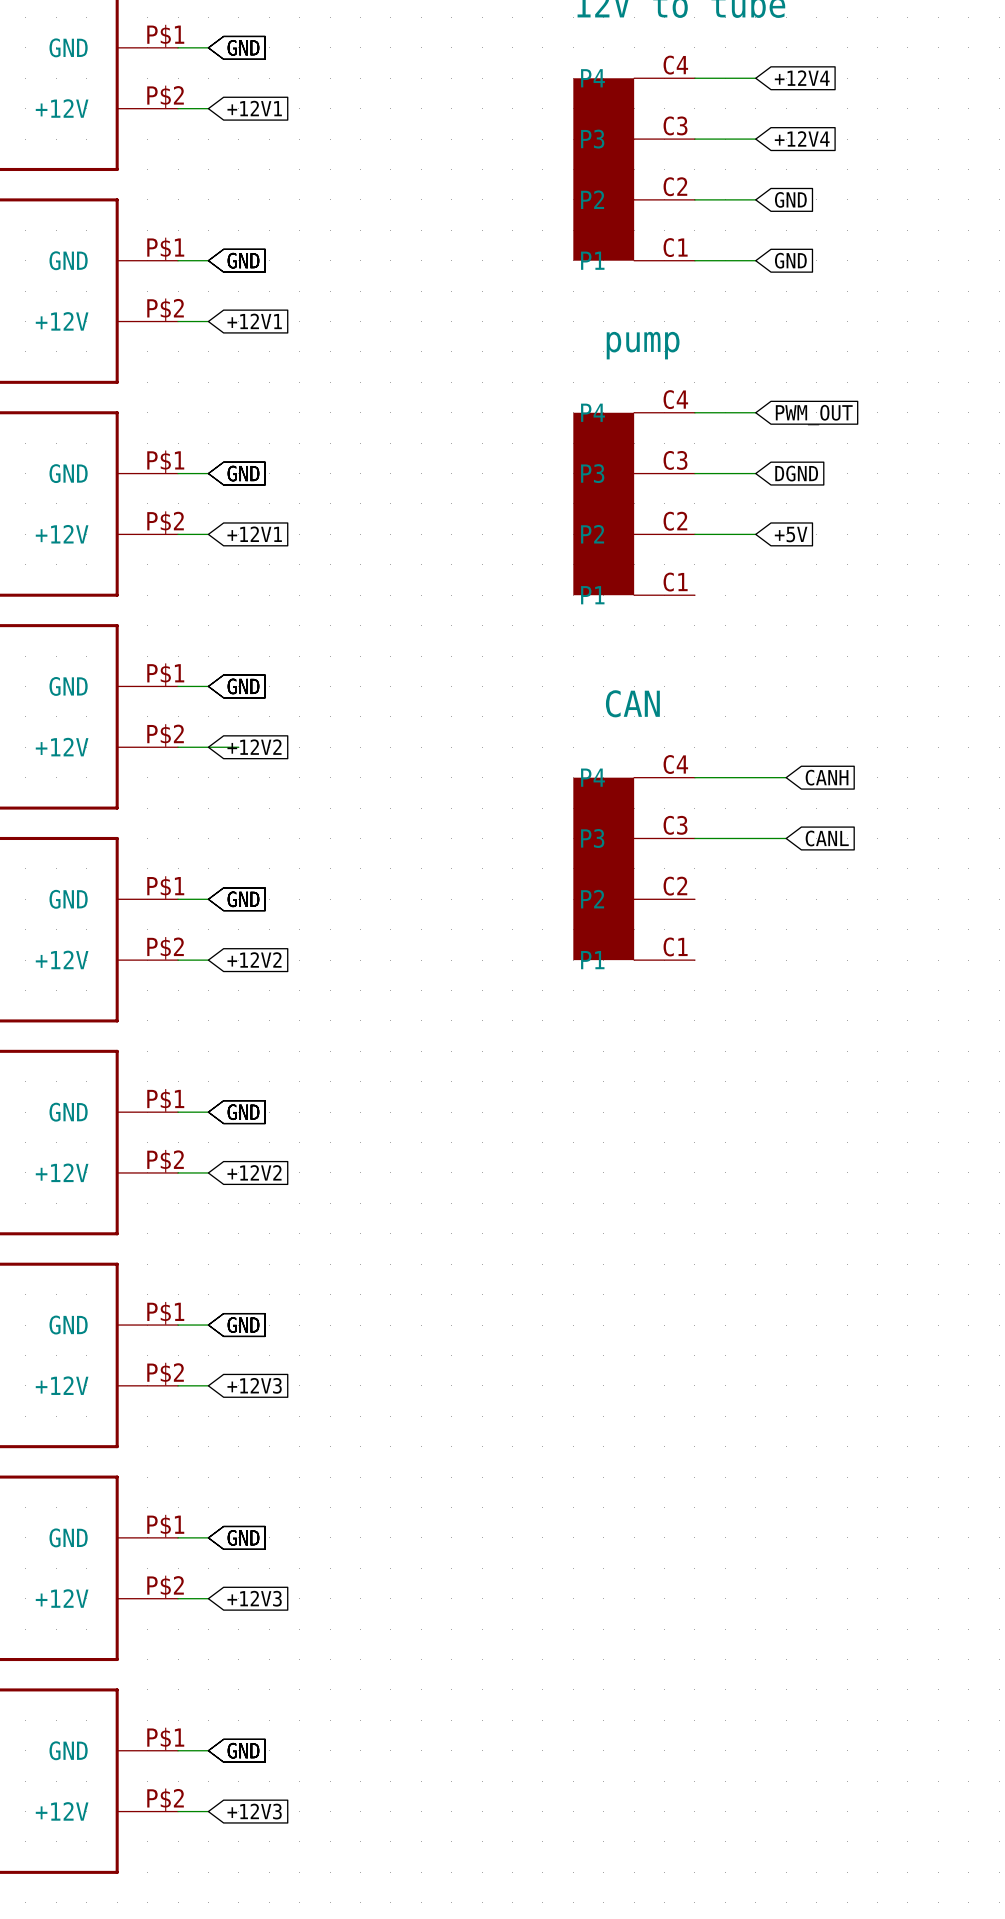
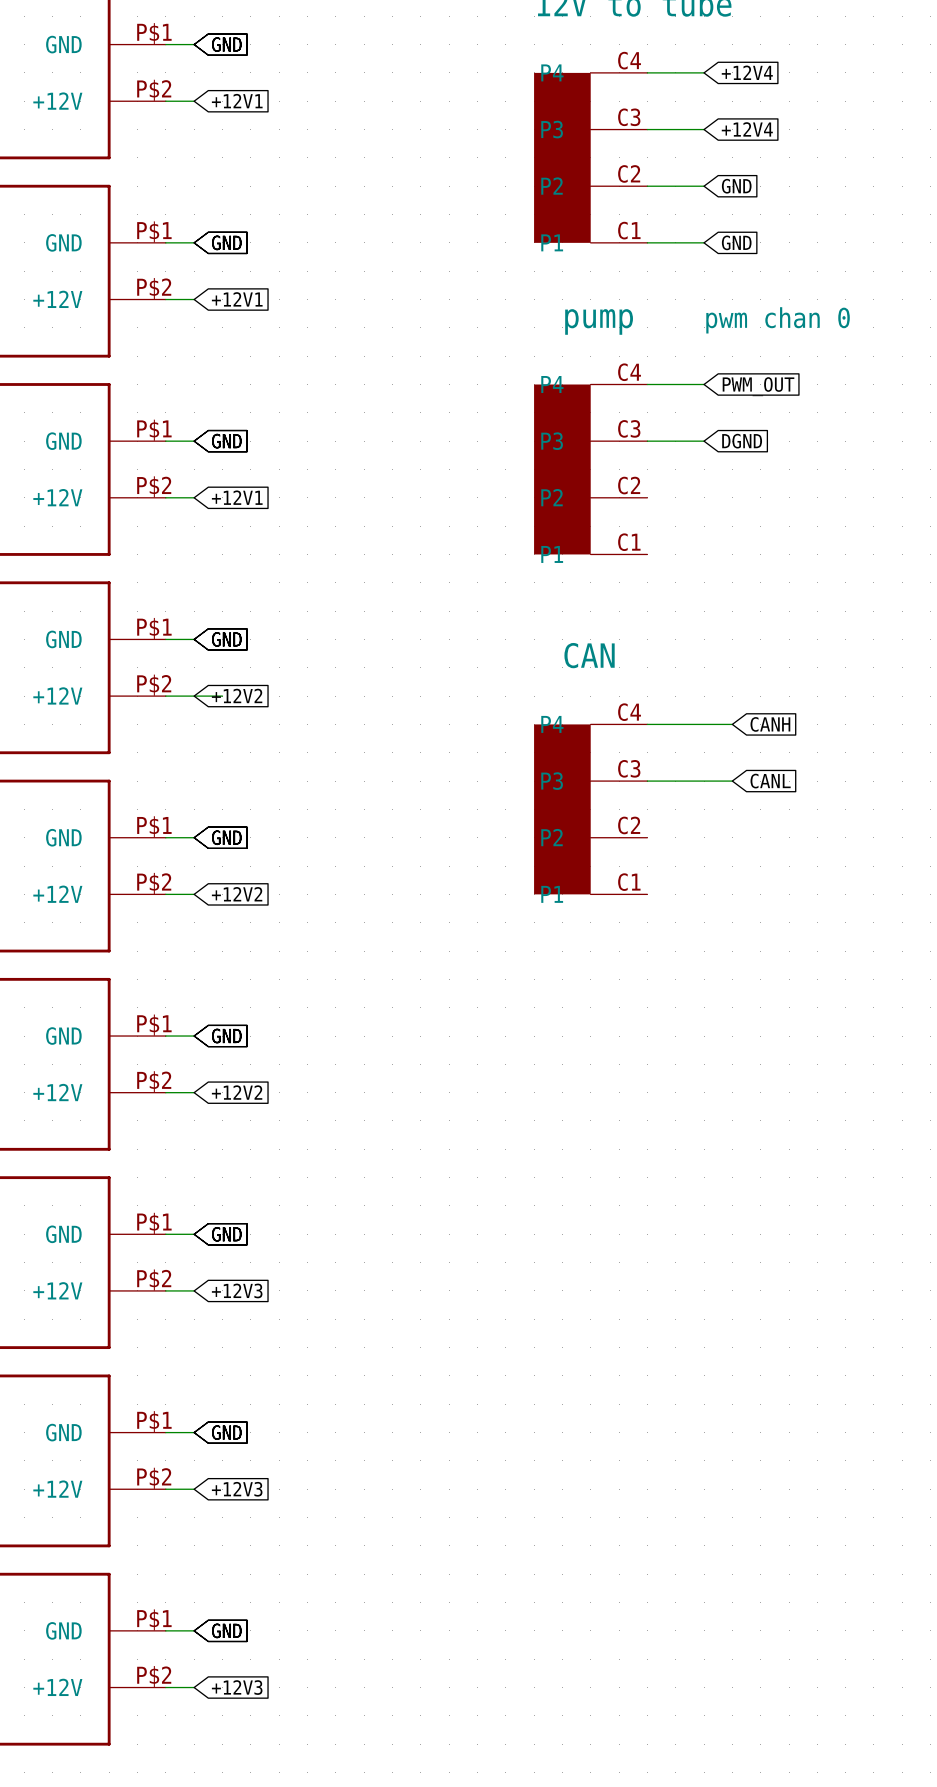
text: none -> pwm chan 0 (778, 320)
wire: (694, 534) (755, 534) -> none
global label: +5V (791, 534) -> none

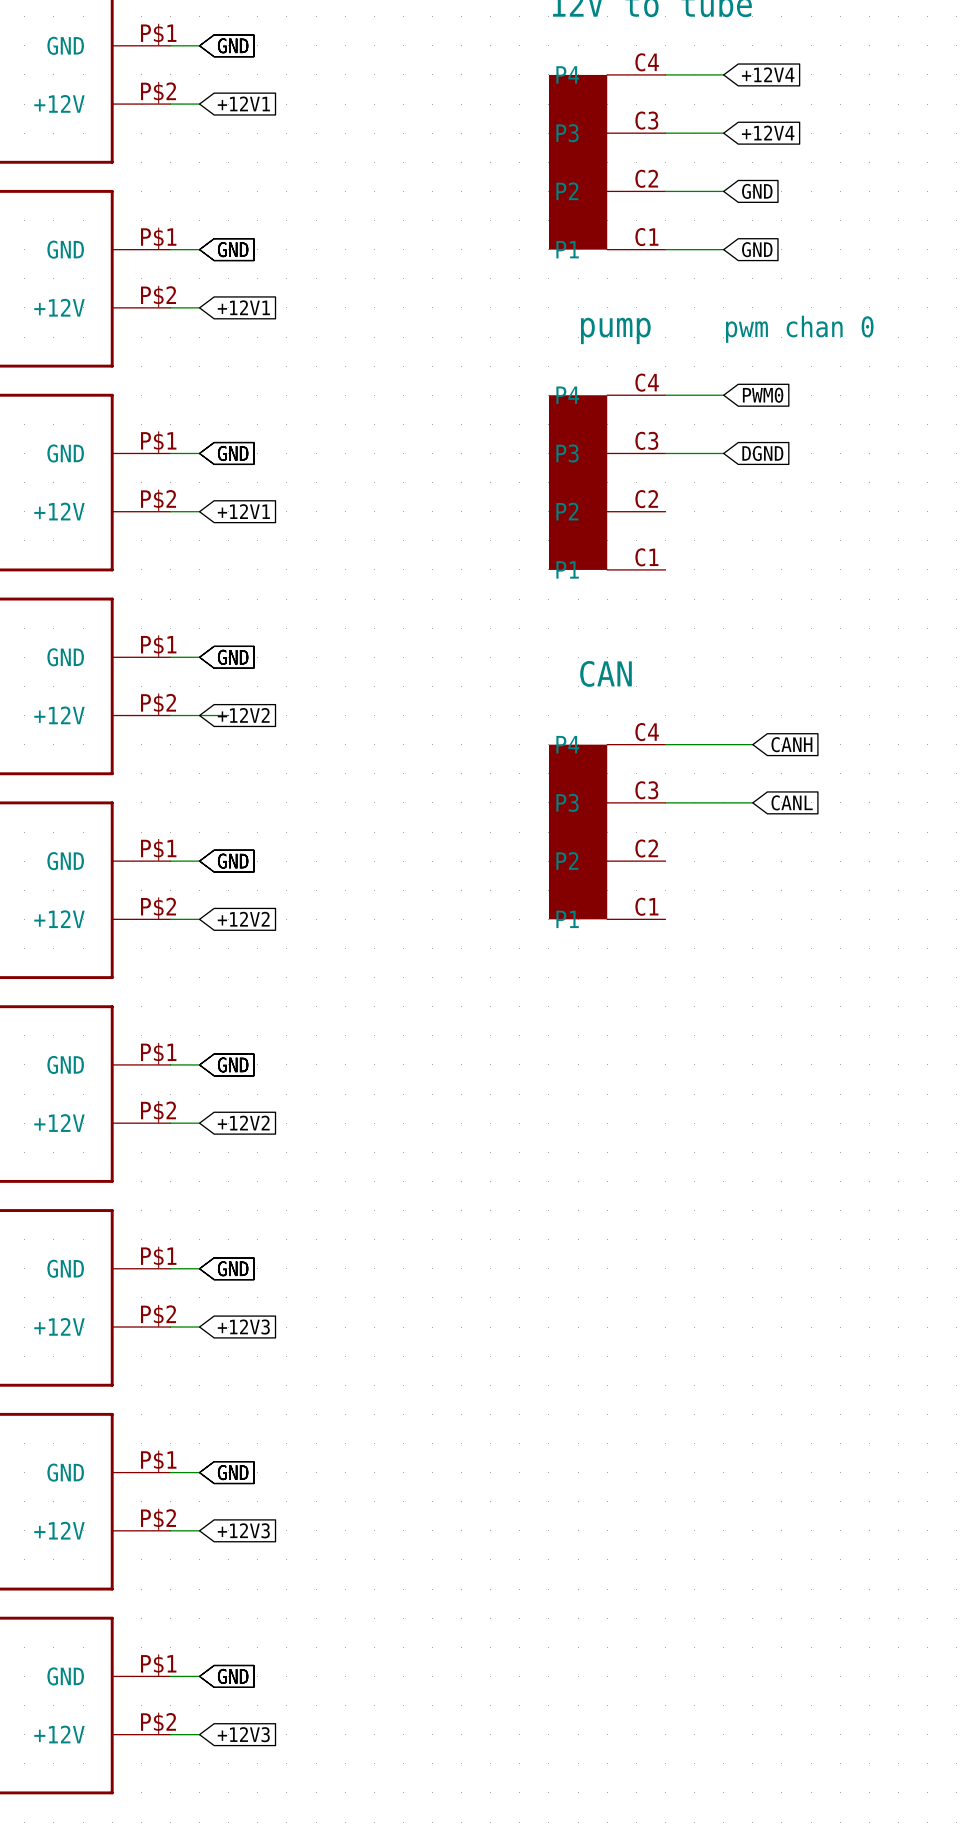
global label: PWM_OUT (758, 386) -> PWM0 (763, 395)

